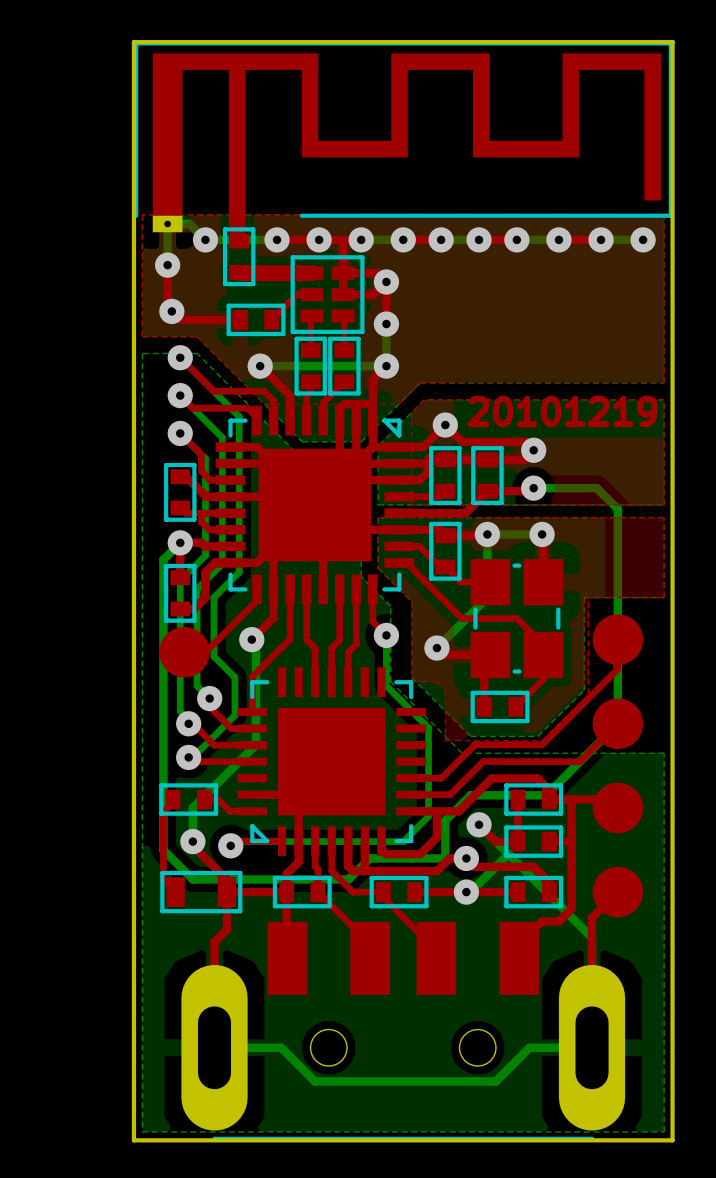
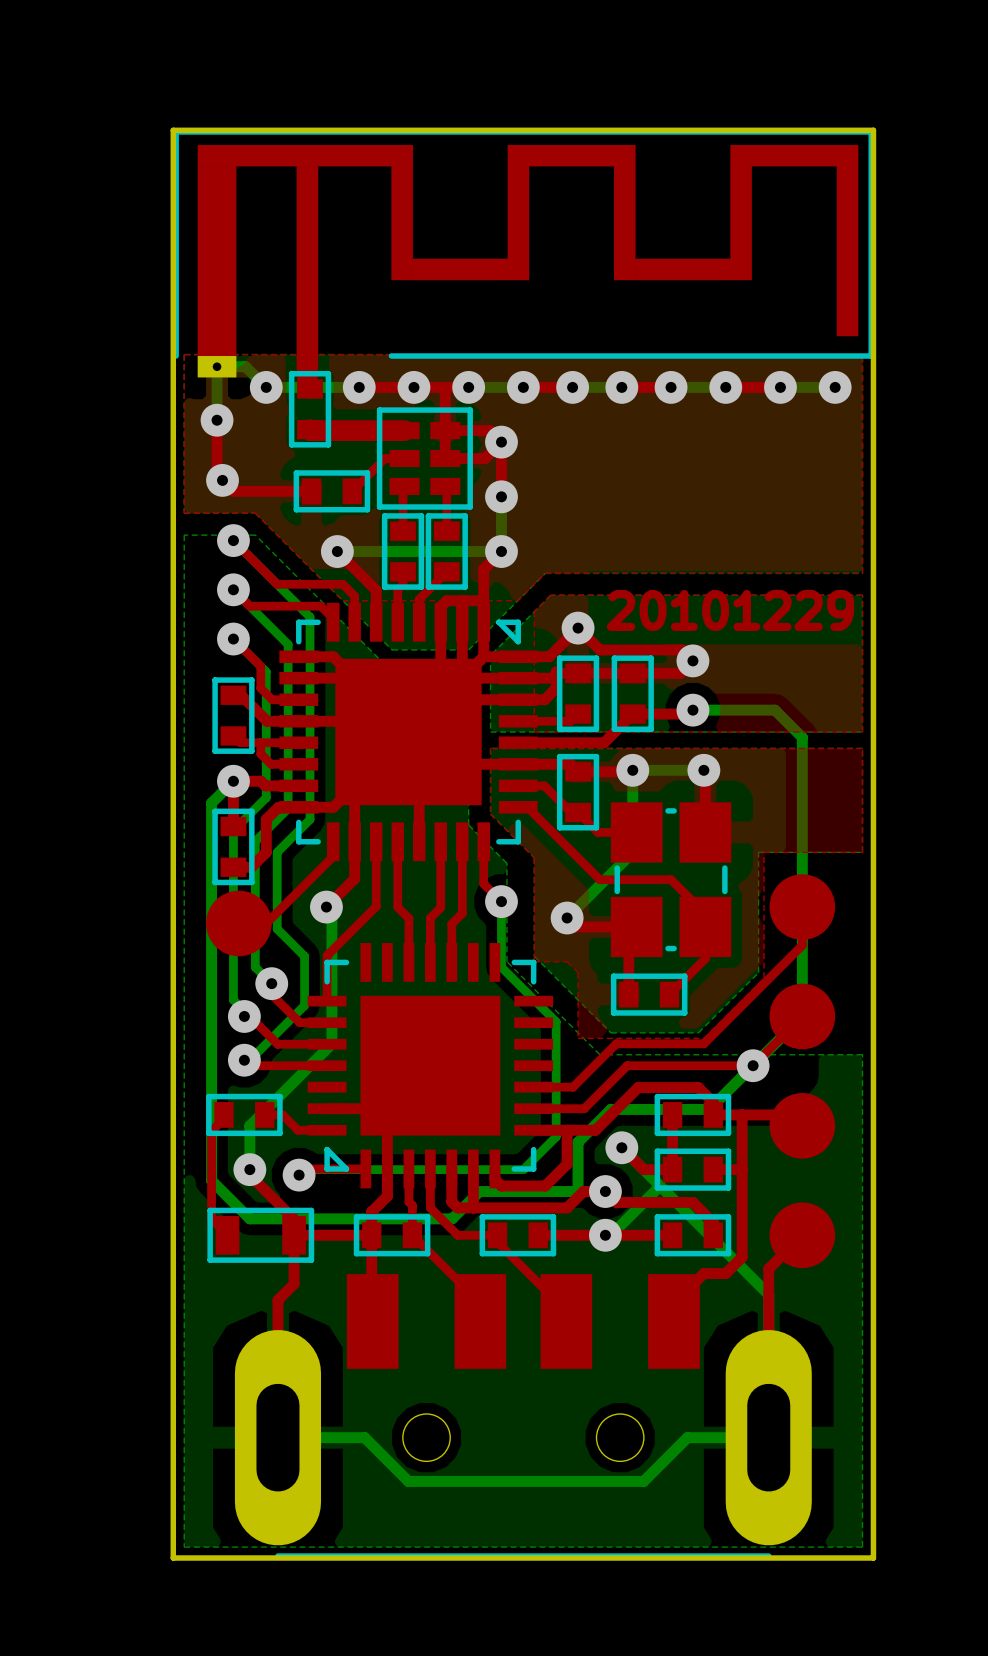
text: 20101219 (562, 411) -> 20101229 (730, 610)
via: none -> (753, 1065)

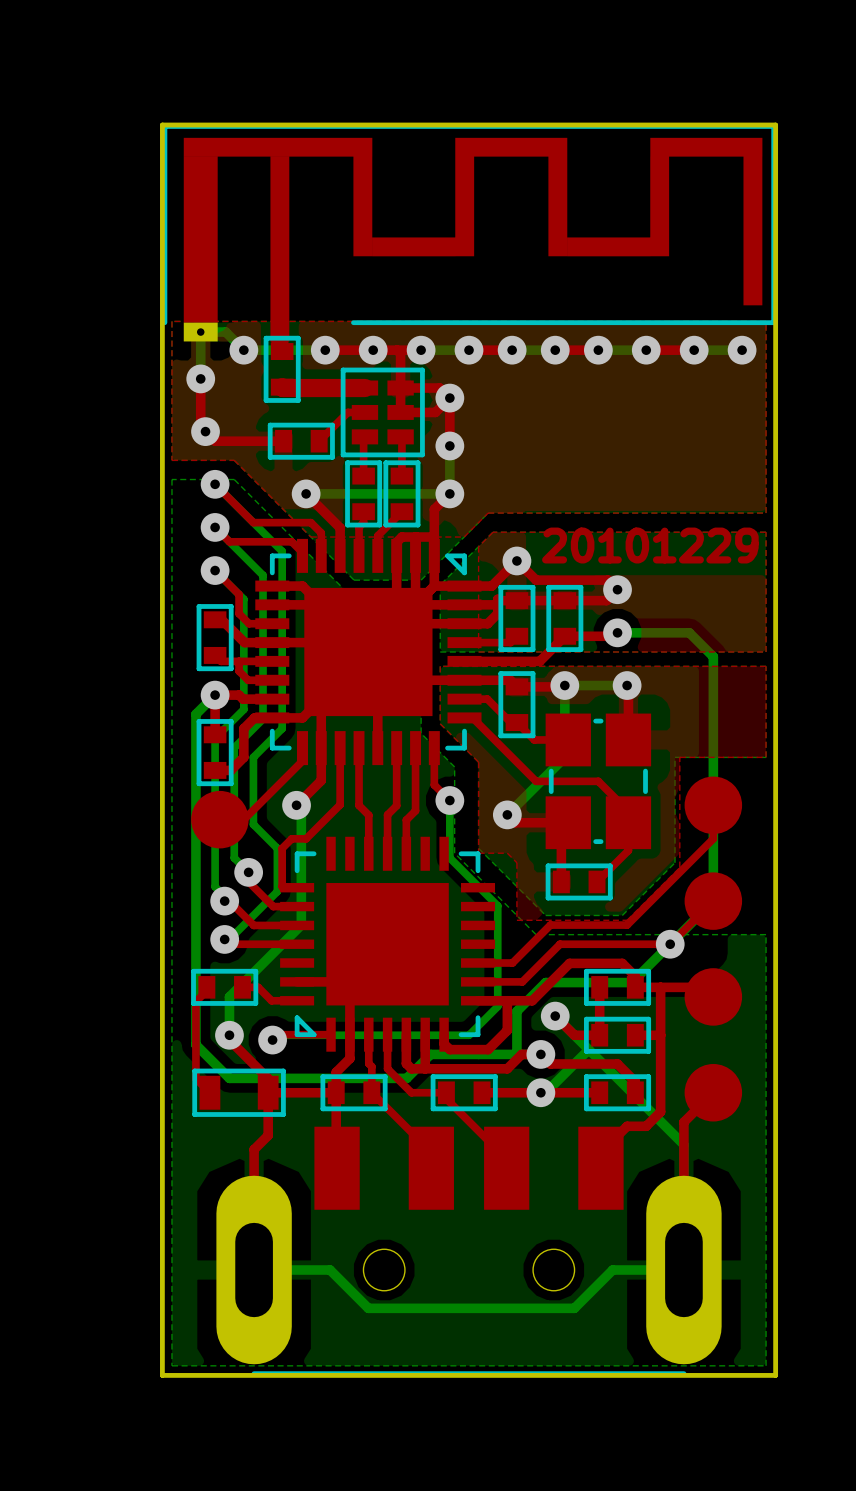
top track: (337, 945) (327, 955) (327, 1001) -> (306, 838) (291, 838) (282, 848) (282, 886) (297, 887)

